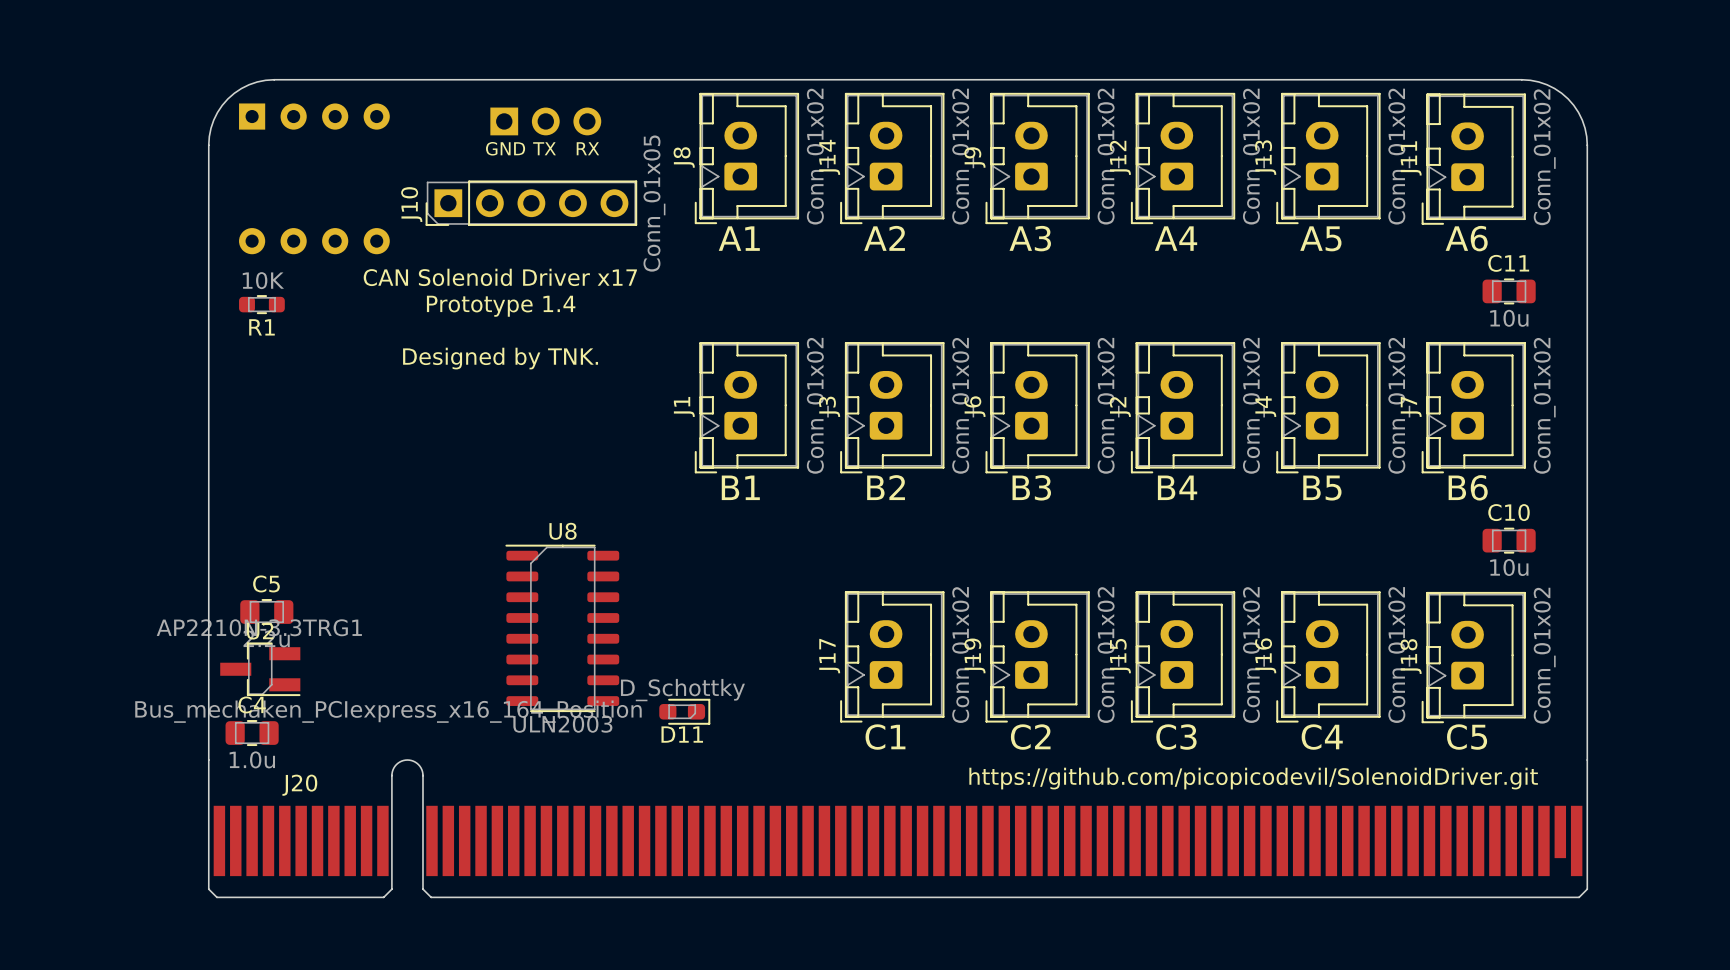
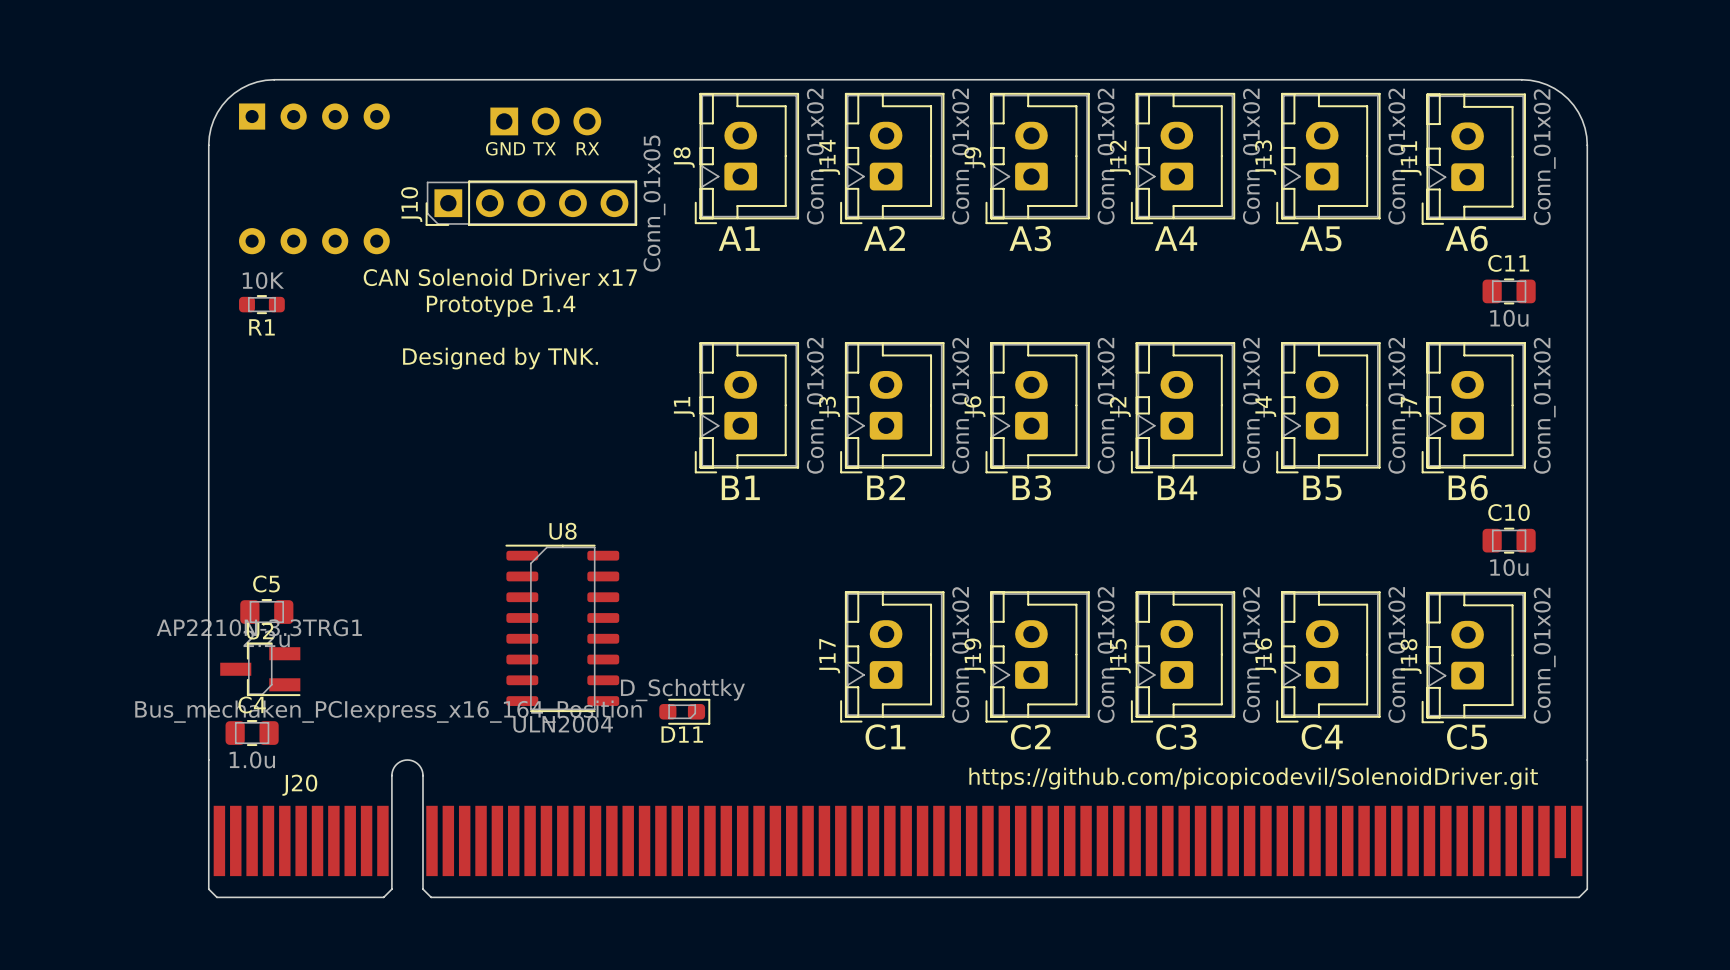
U8 value: ULN2003 (562, 724) -> ULN2004 (563, 724)

